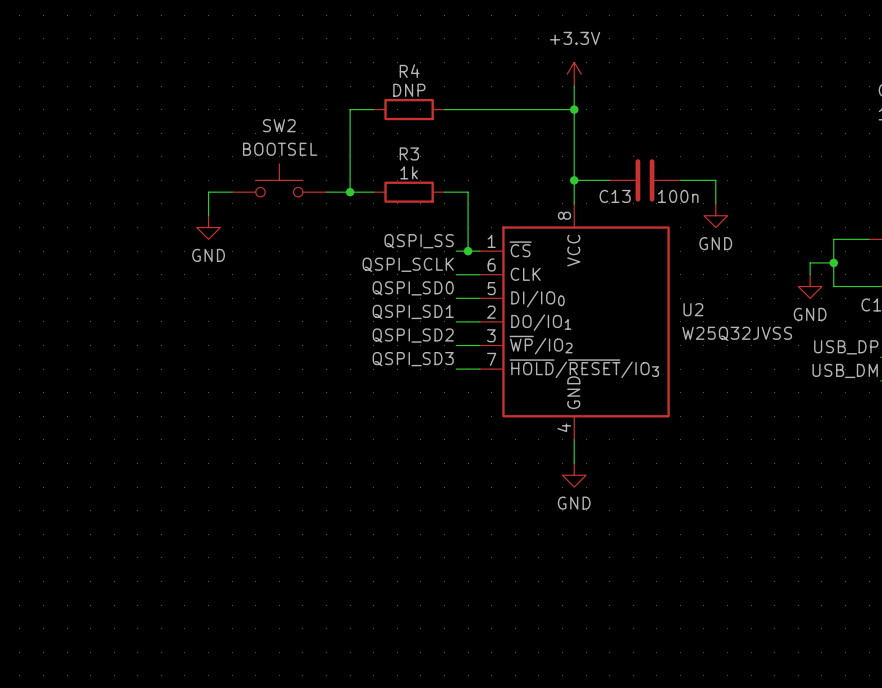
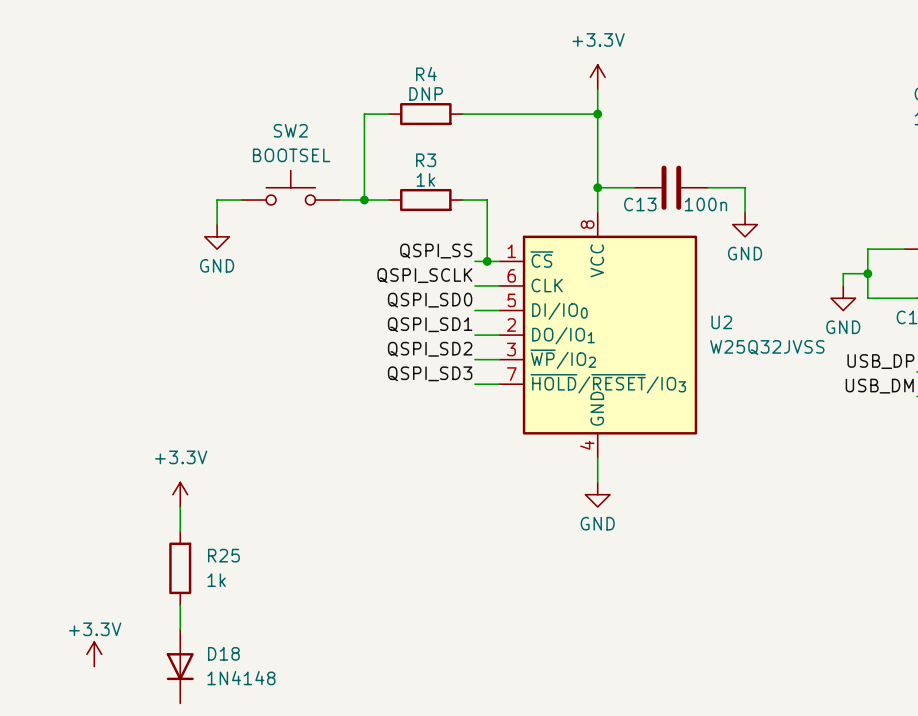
power symbol: none -> +3.3V (180, 494)
wire: none -> (180, 506) (180, 531)
R25: none -> 1k (180, 568)
wire: none -> (180, 605) (180, 629)
power symbol: none -> +3.3V (94, 654)
D18: none -> 1N4148 (180, 666)

